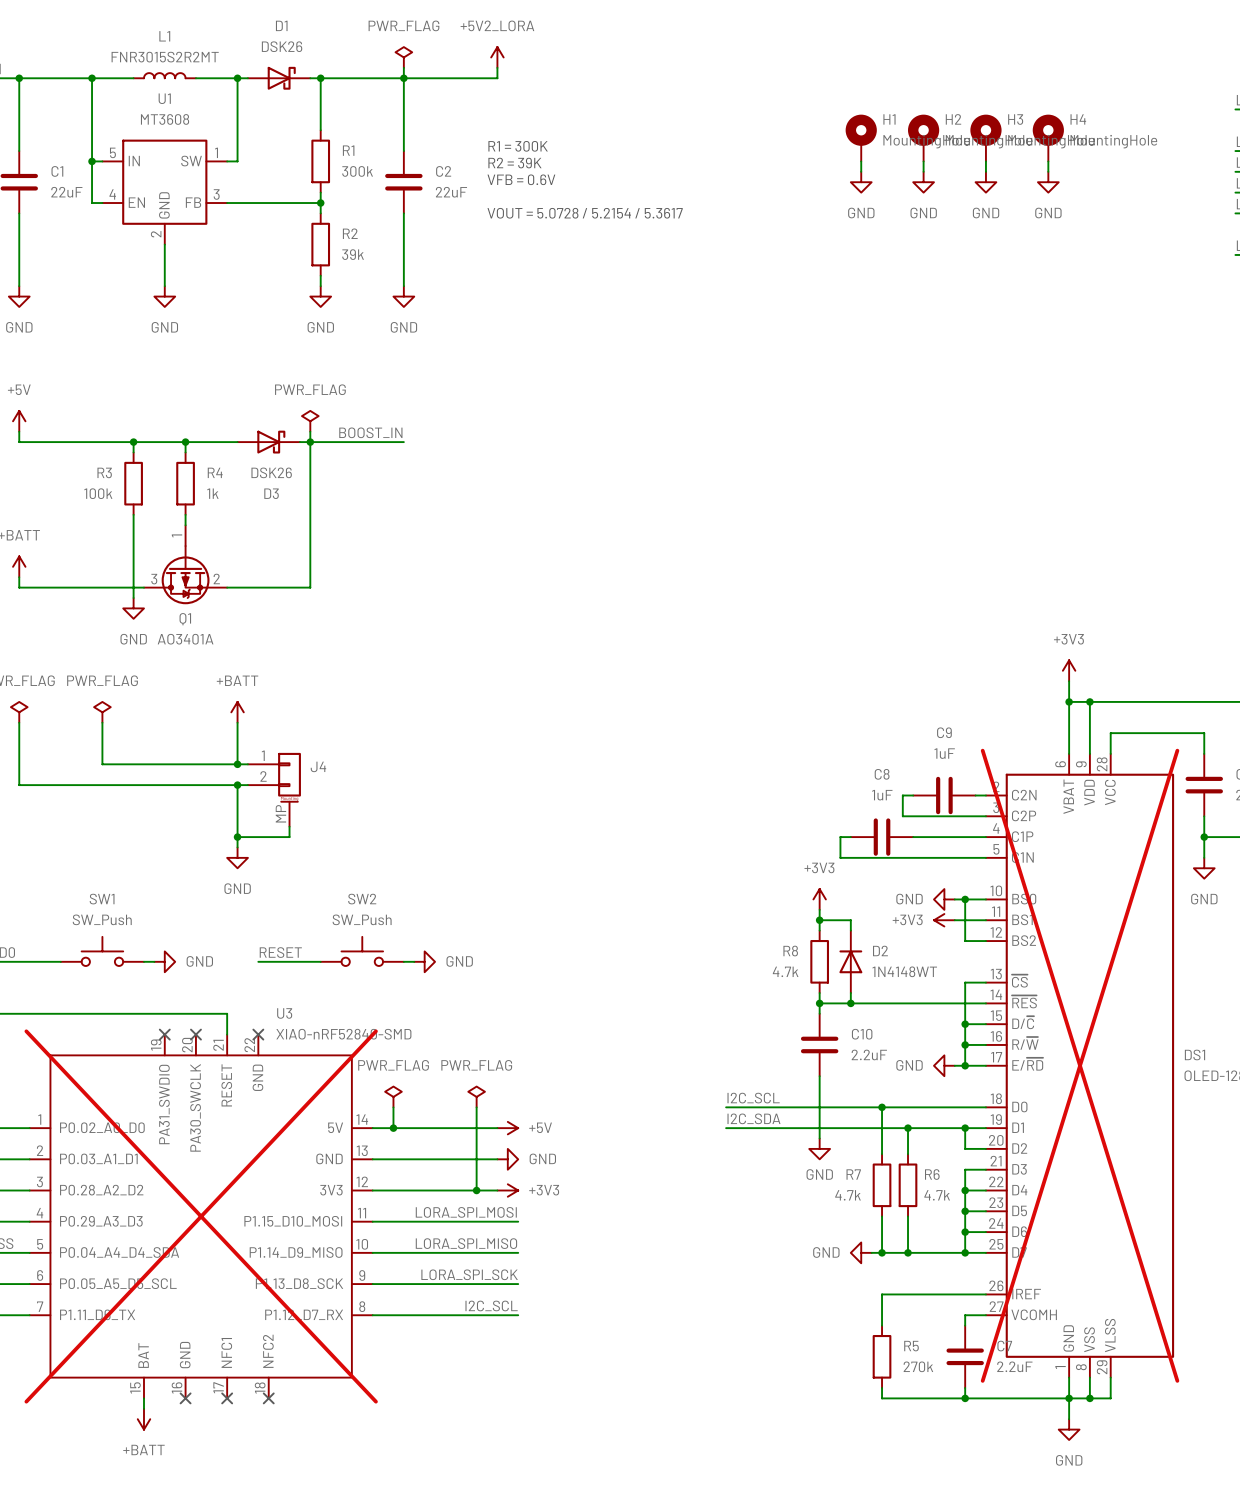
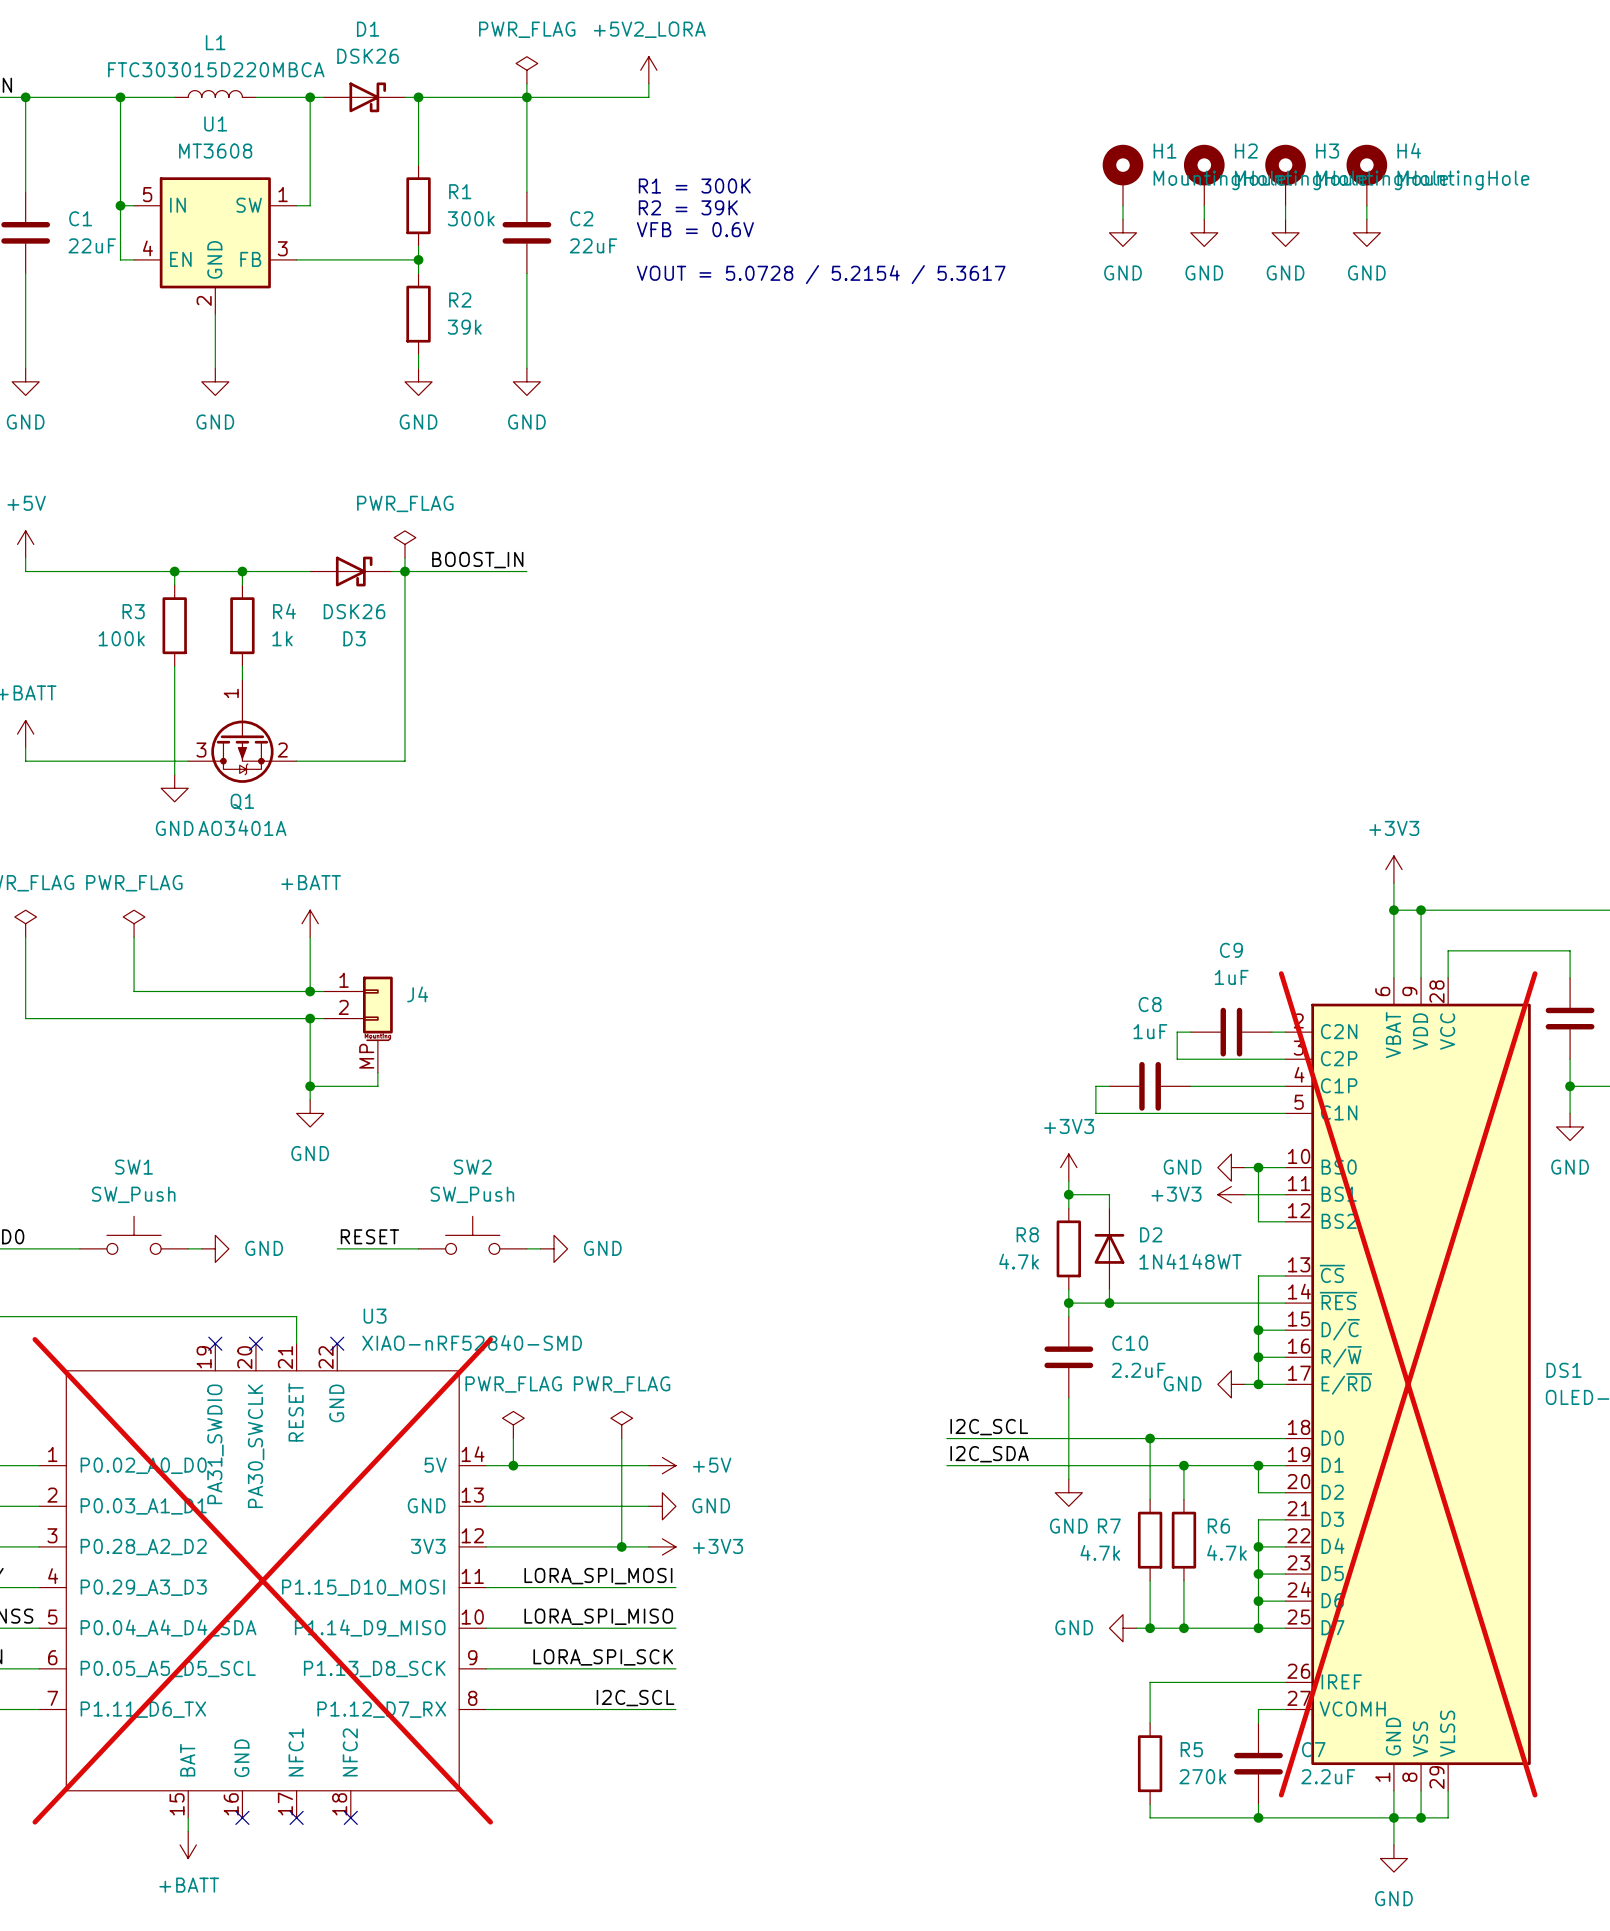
L1 value: FNR3015S2R2MT (165, 57) -> FTC303015D220MBCA (216, 69)

